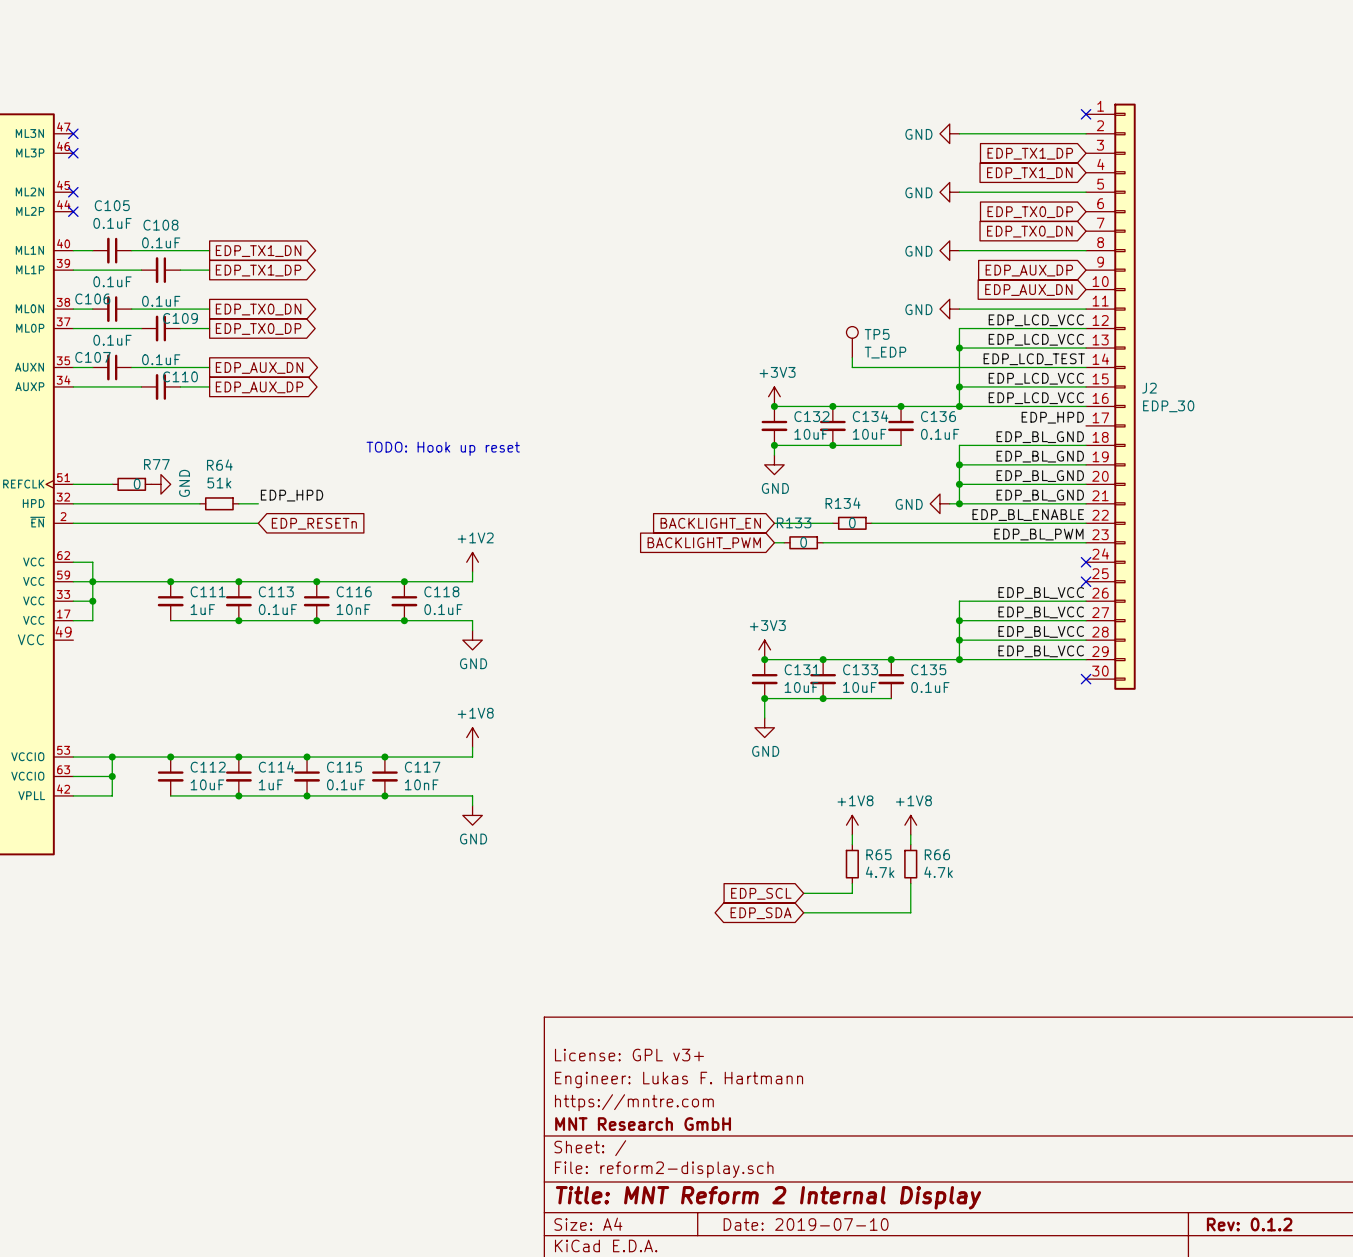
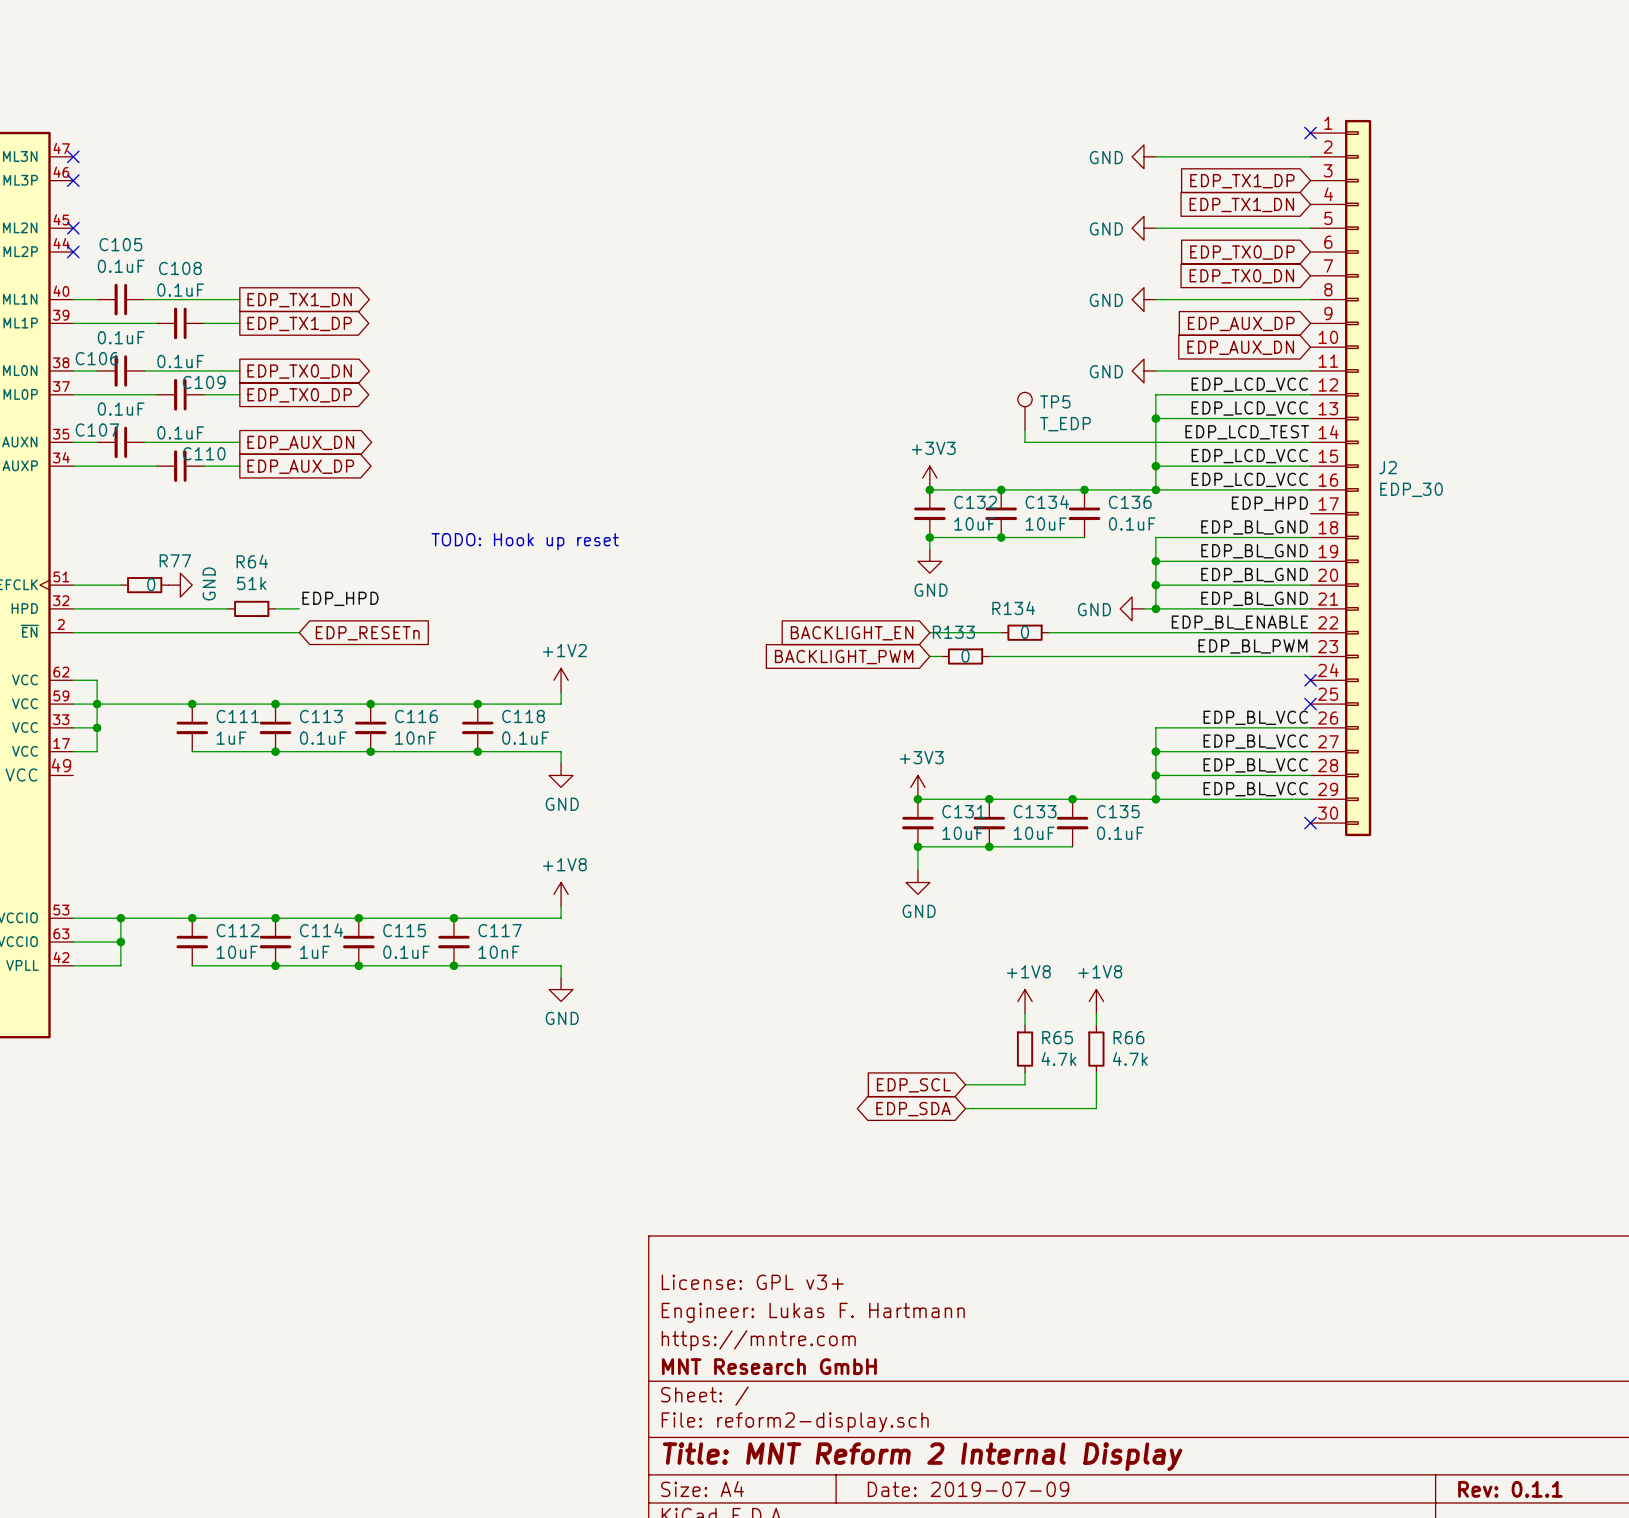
title block: Date: 2019-07-10 (806, 1224) -> Date: 2019-07-09 (968, 1489)
title block: Rev: 0.1.2 (1249, 1224) -> Rev: 0.1.1 (1510, 1489)

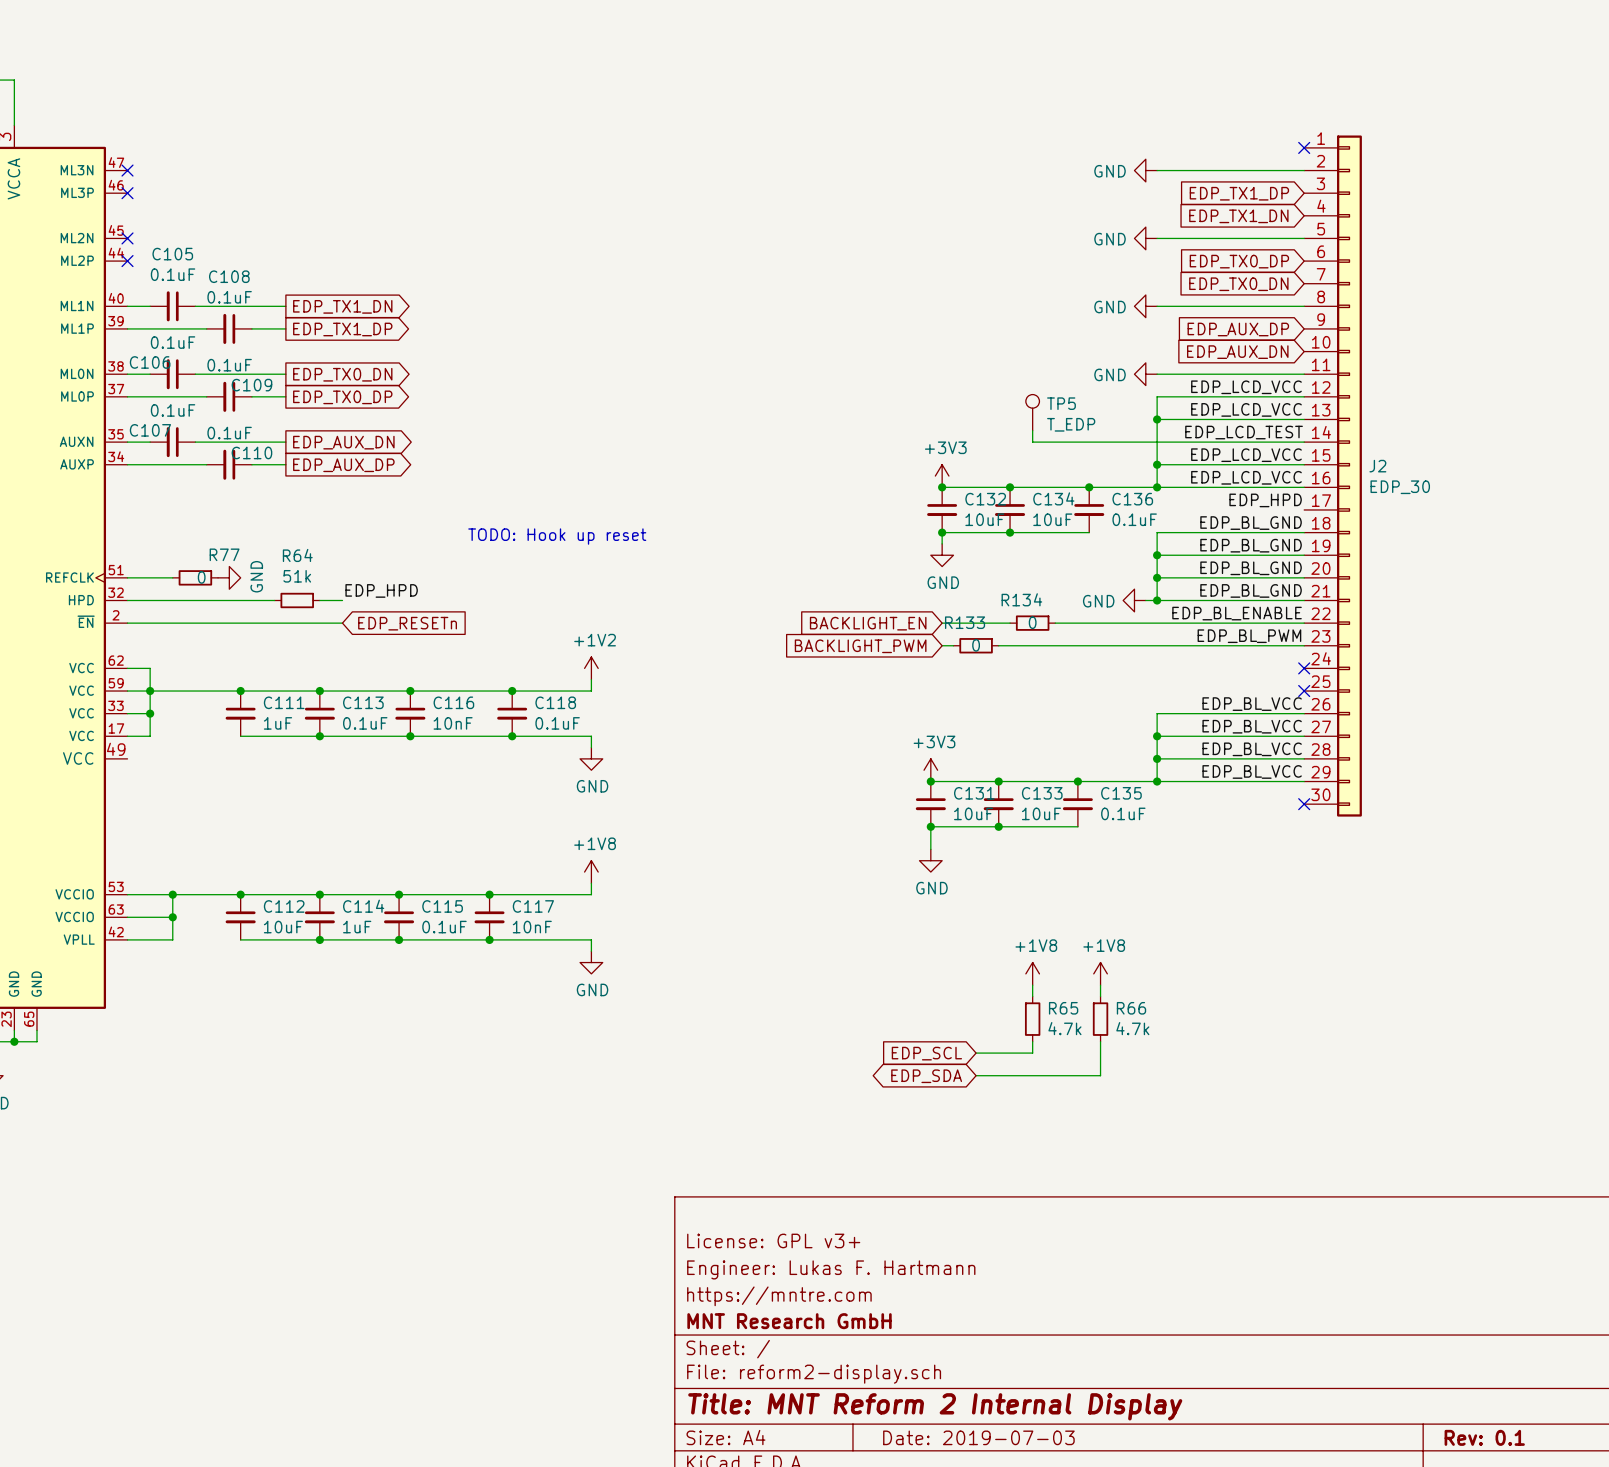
title block: Date: 2019-07-09 (968, 1489) -> Date: 2019-07-03 (978, 1437)
title block: Rev: 0.1.1 (1510, 1489) -> Rev: 0.1 (1484, 1437)

